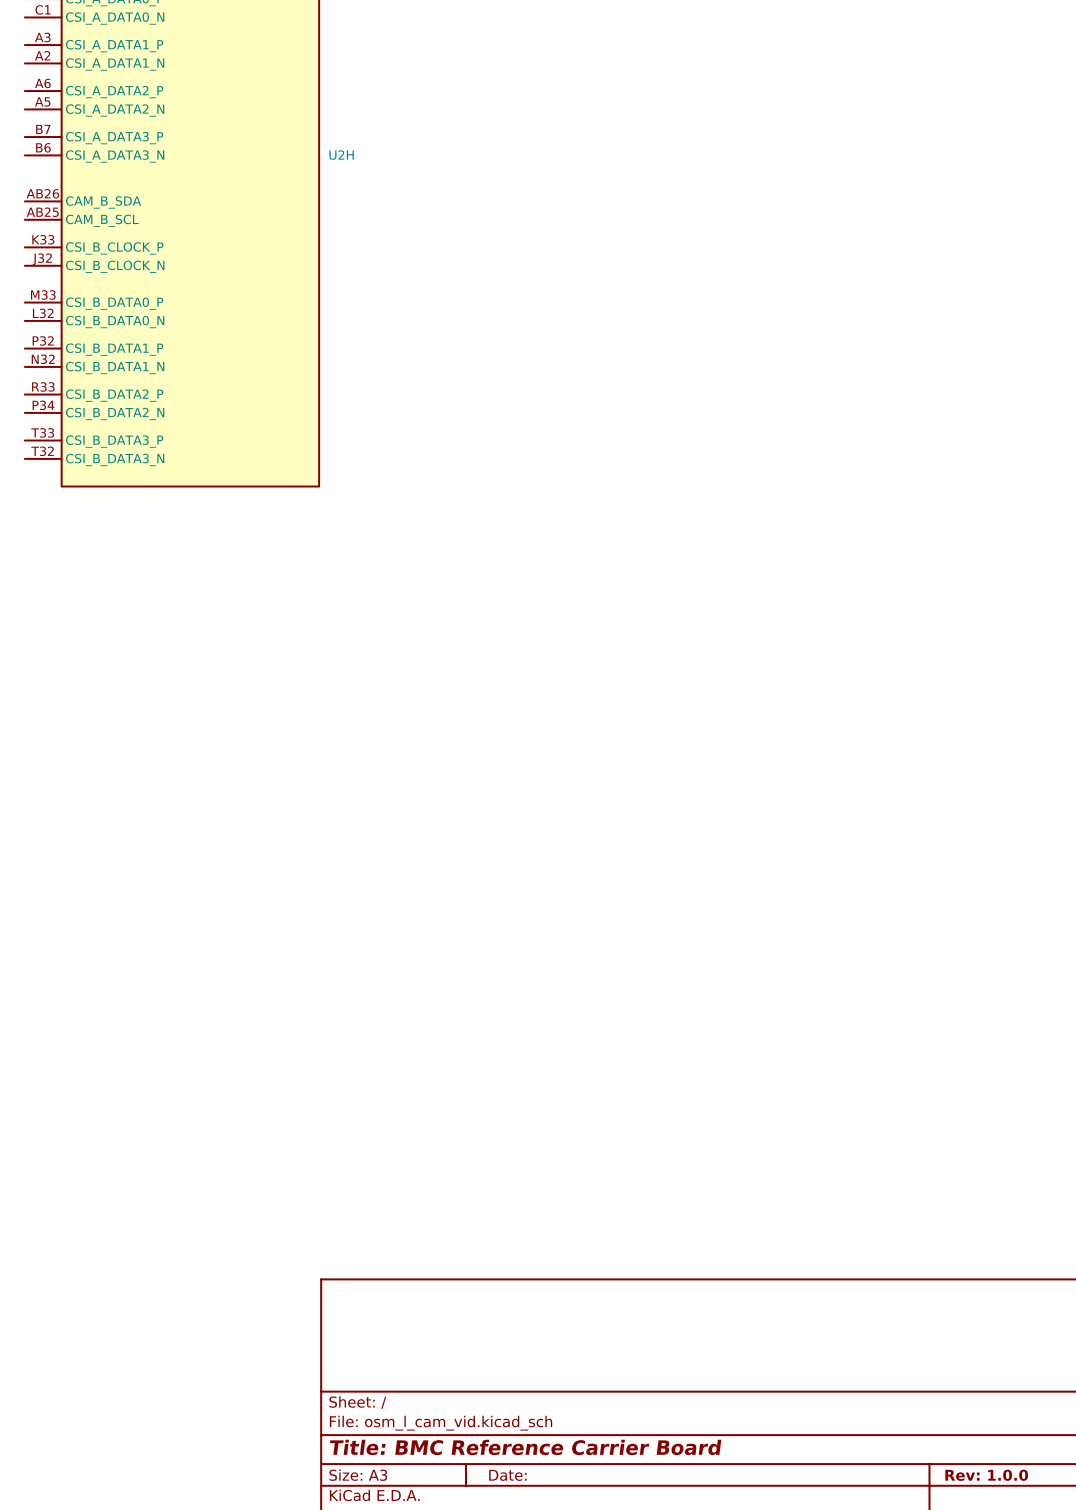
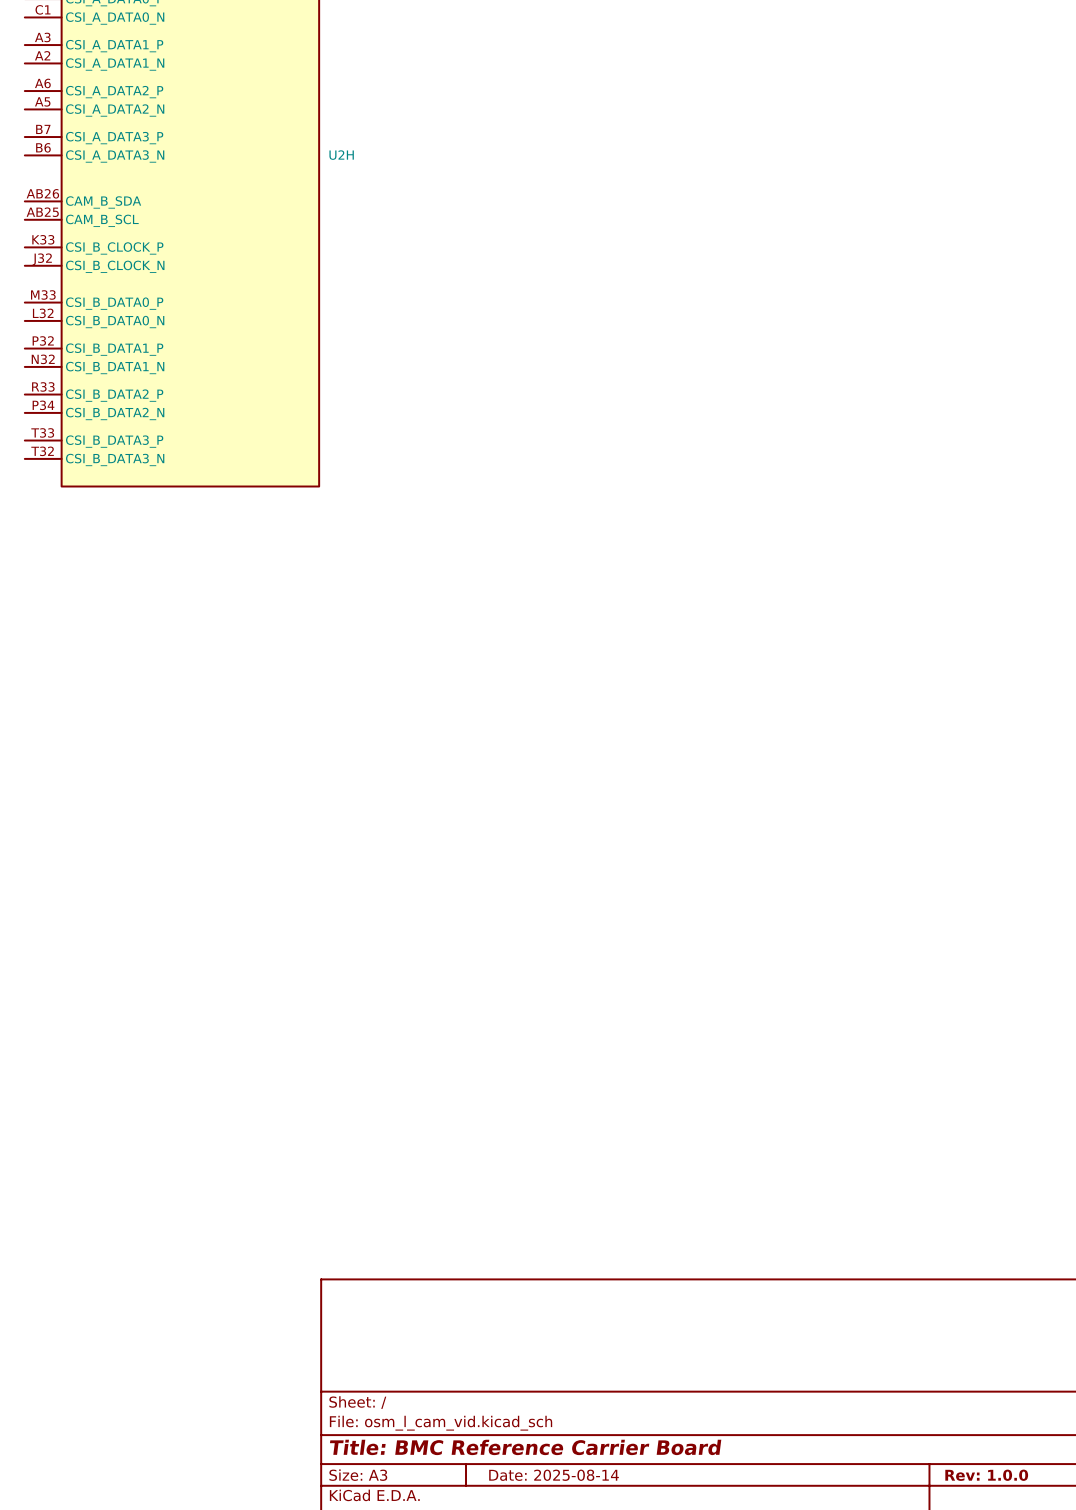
title block: Date: (507, 1475) -> Date: 2025-08-14 (554, 1475)

